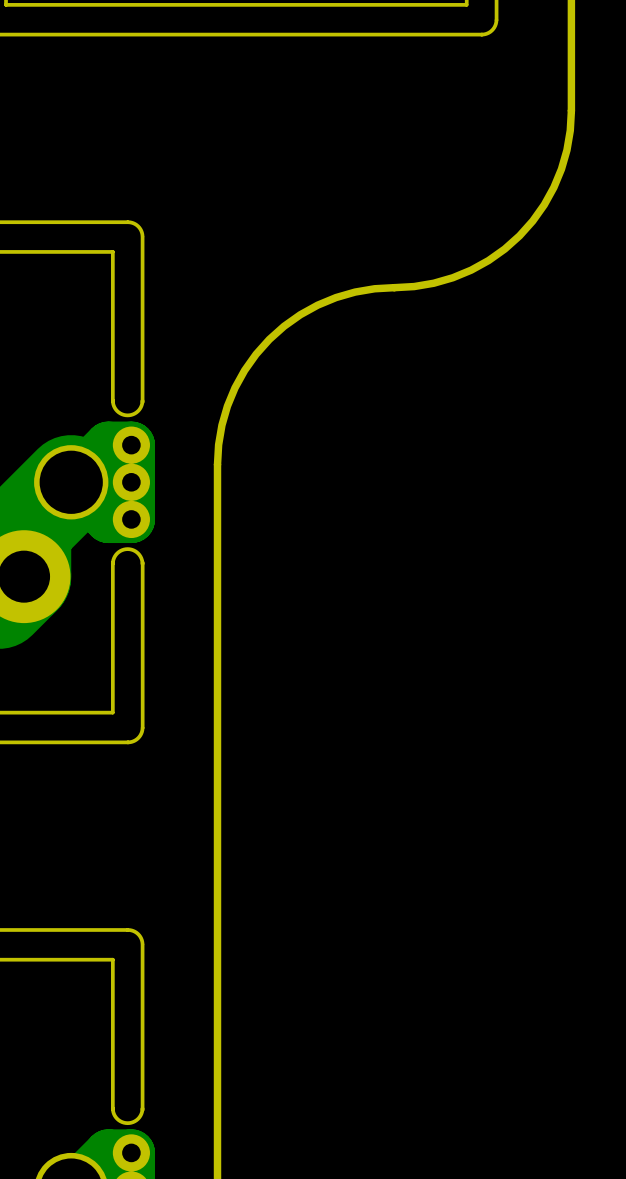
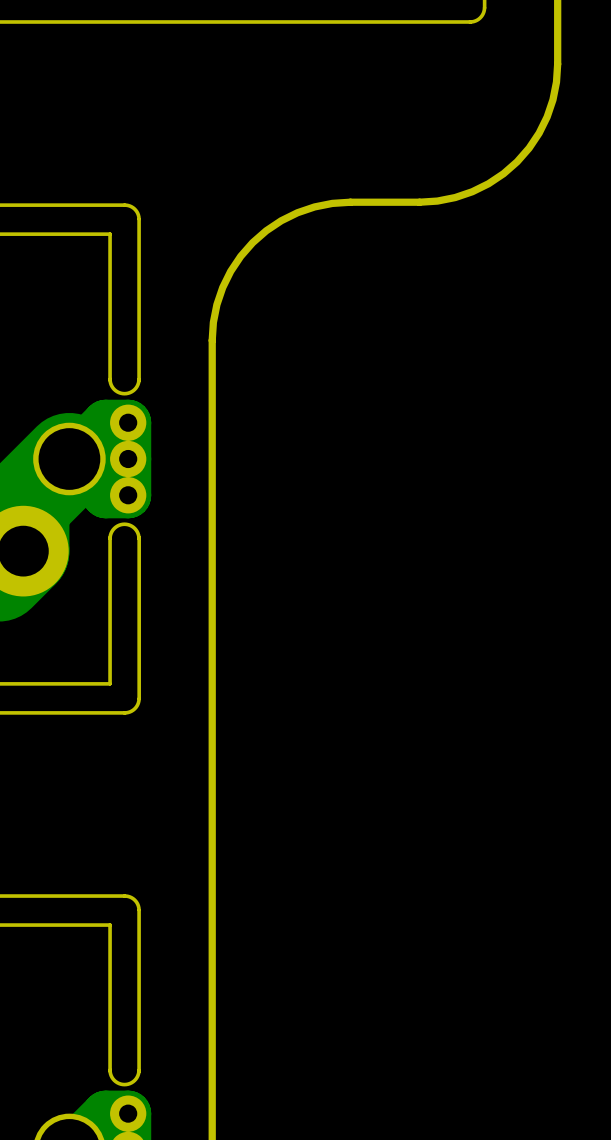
board edge: (571, 77) (570, 130) (561, 169) (544, 204) (519, 235) (488, 260) (452, 277) (414, 286) (355, 292) (317, 305) (284, 326) (256, 354) (235, 387) (221, 425) (217, 464) -> (557, 64) (552, 99) (539, 133) (517, 161) (488, 183) (455, 197) (437, 201) (350, 202) (314, 206) (281, 220) (252, 242) (230, 271) (216, 304) (212, 340) (212, 441)

